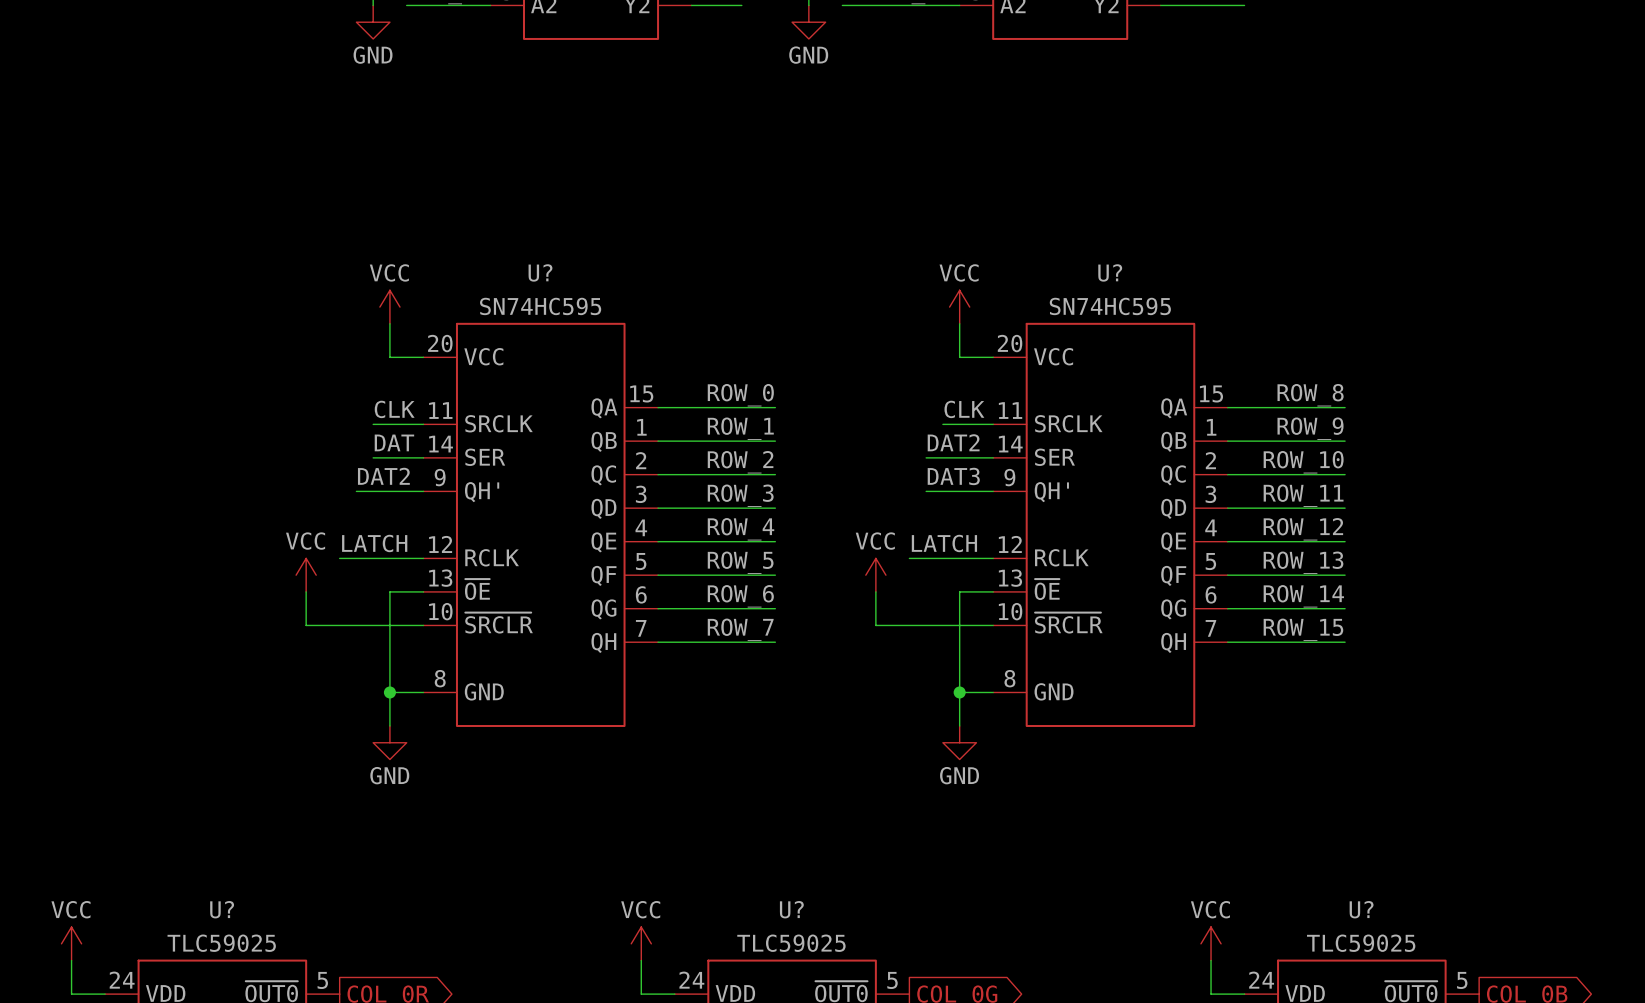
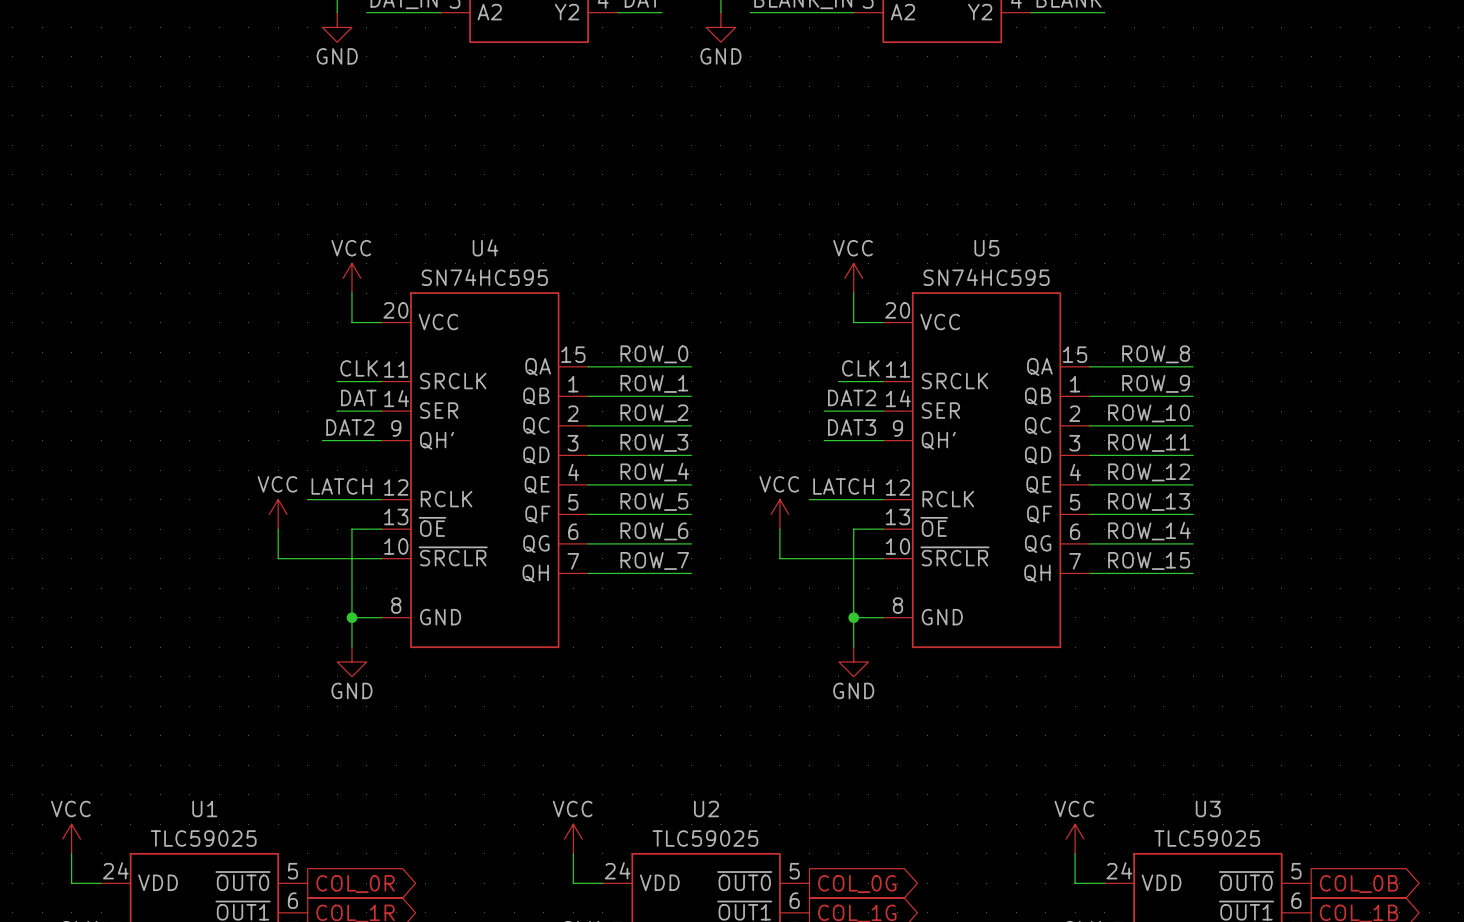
U? name: U? (540, 272) -> U4 (485, 247)
U? name: U? (1110, 272) -> U5 (986, 248)
U? name: U? (222, 909) -> U1 (204, 808)
U? name: U? (791, 909) -> U2 (706, 808)
U? name: U? (1361, 909) -> U3 (1208, 808)

